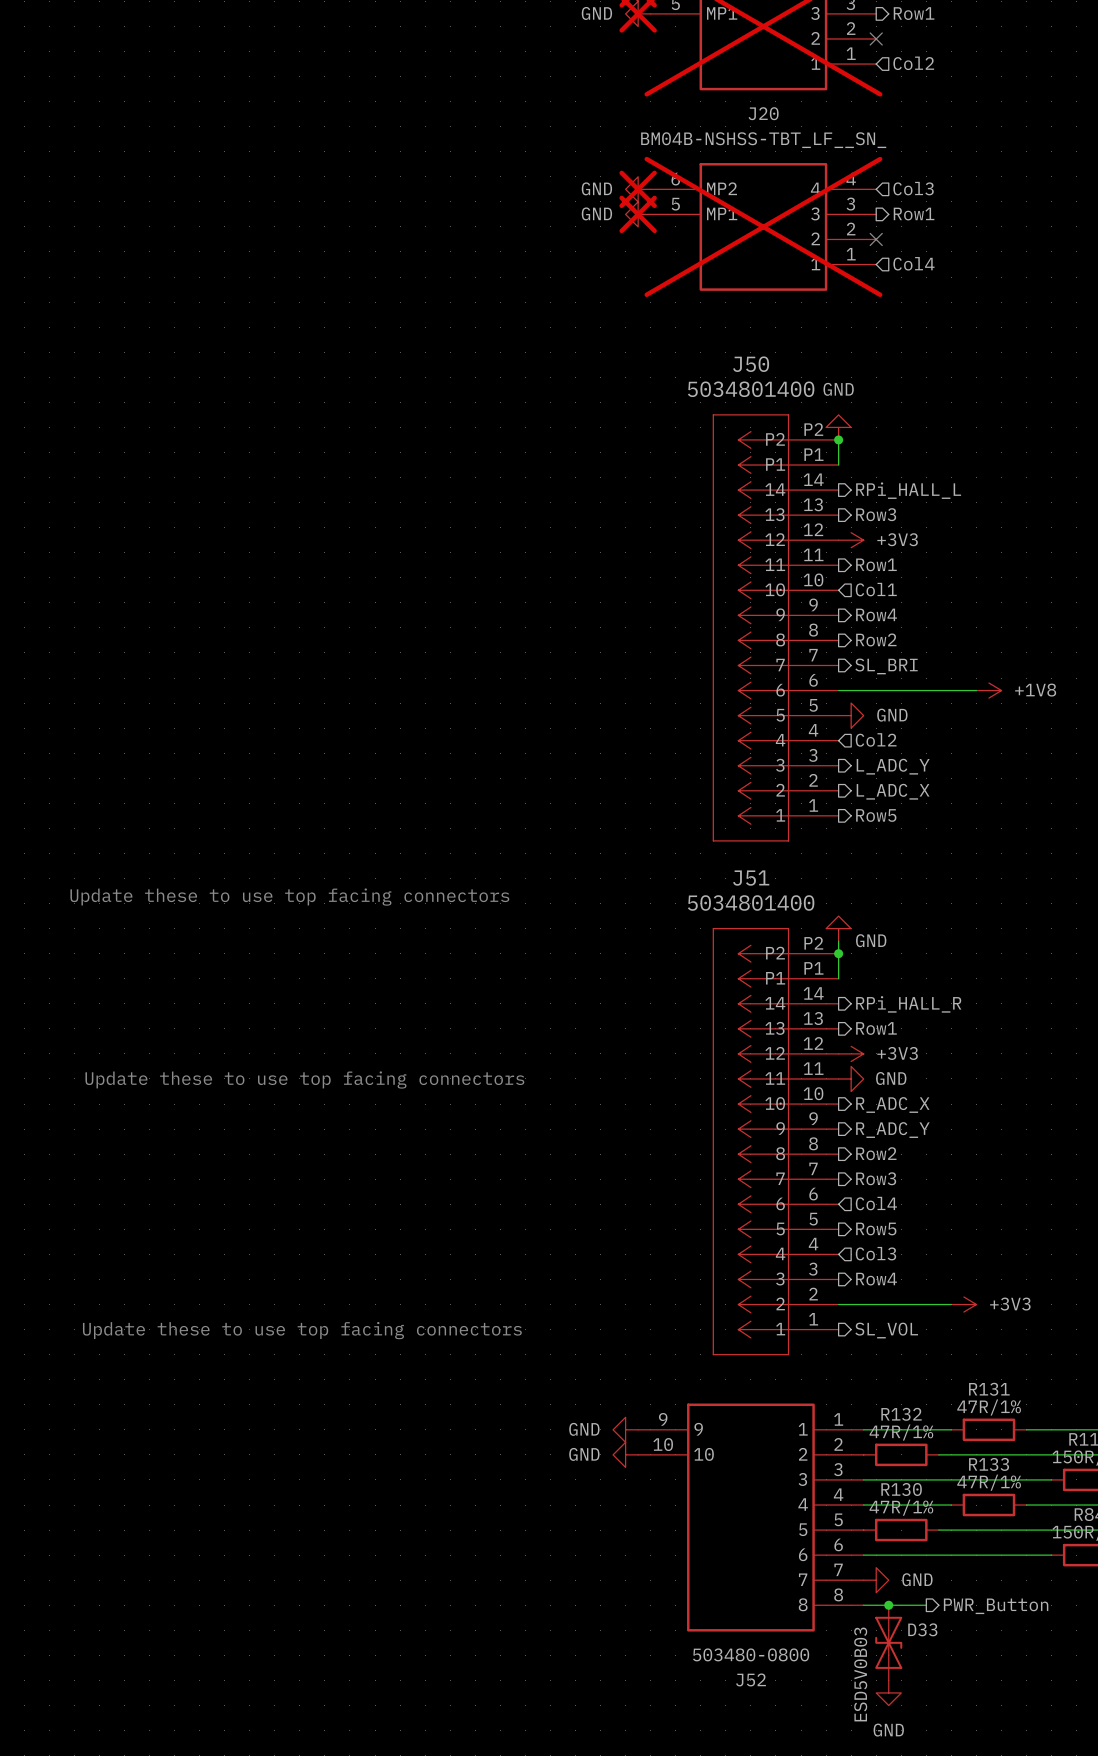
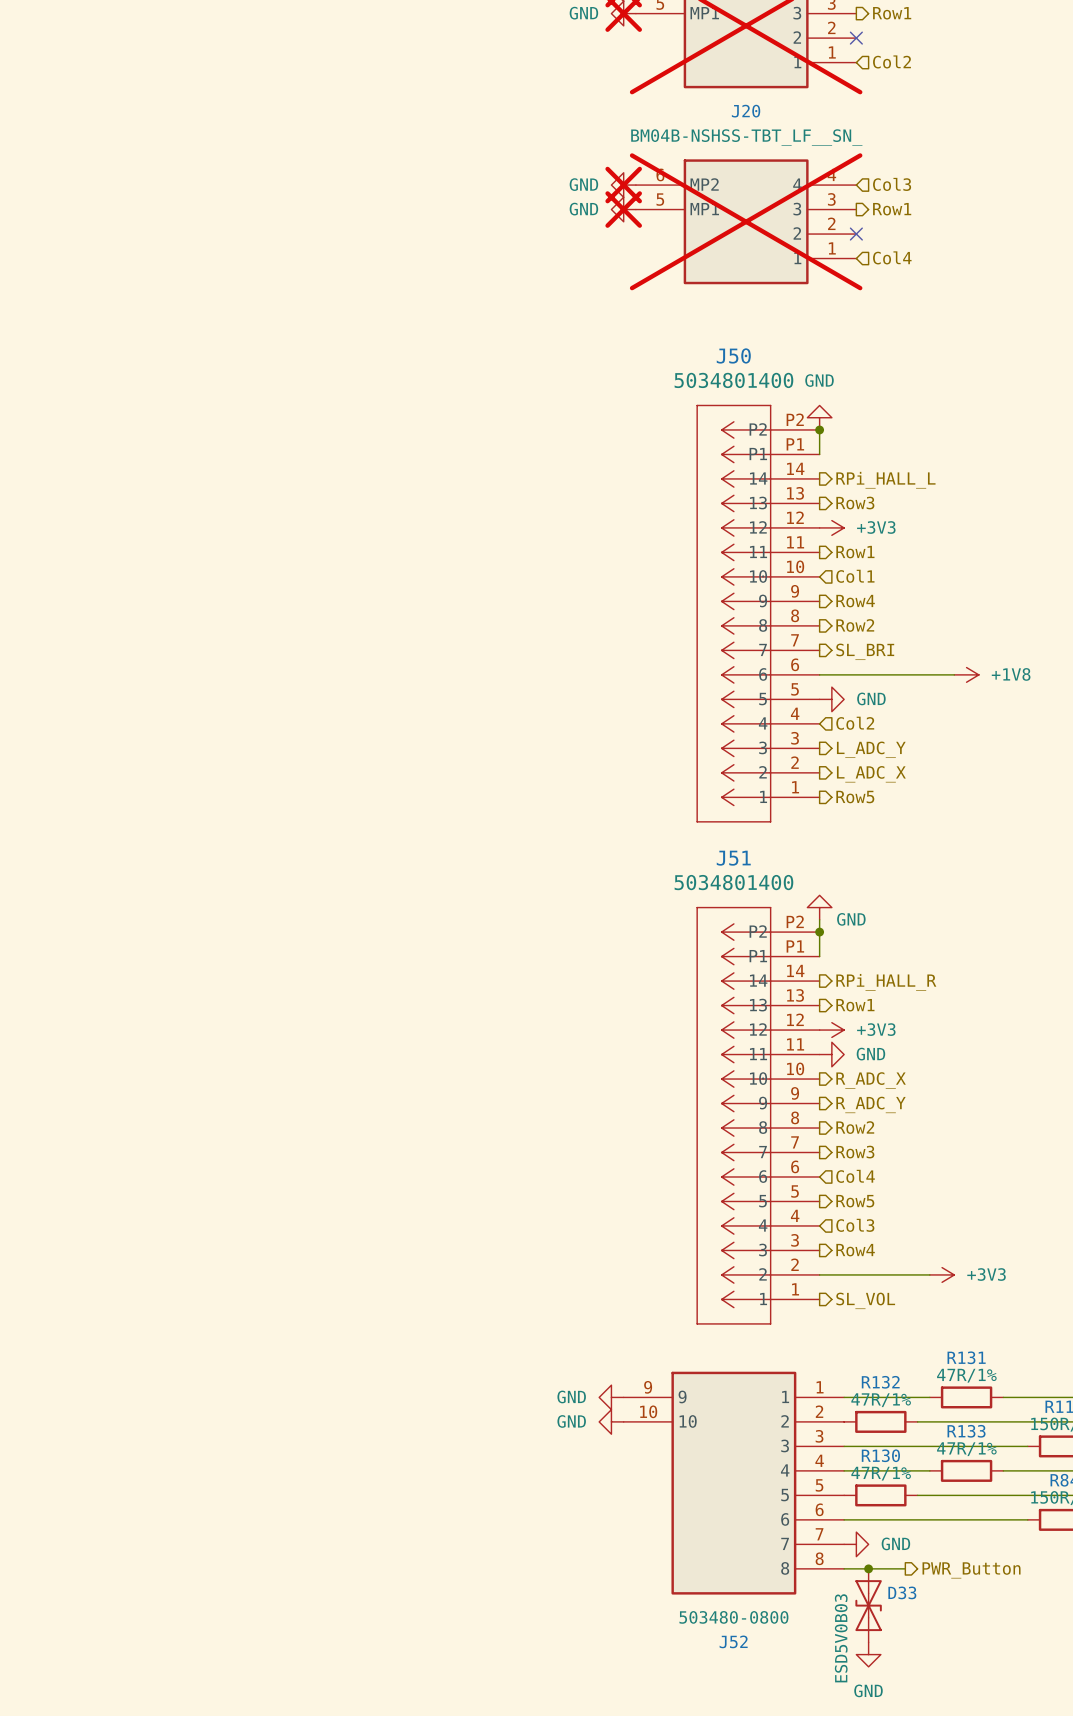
text: Update these to use top facing connectors (289, 897) -> none
text: Update these to use top facing connectors (304, 1080) -> none
text: Update these to use top facing connectors (302, 1330) -> none

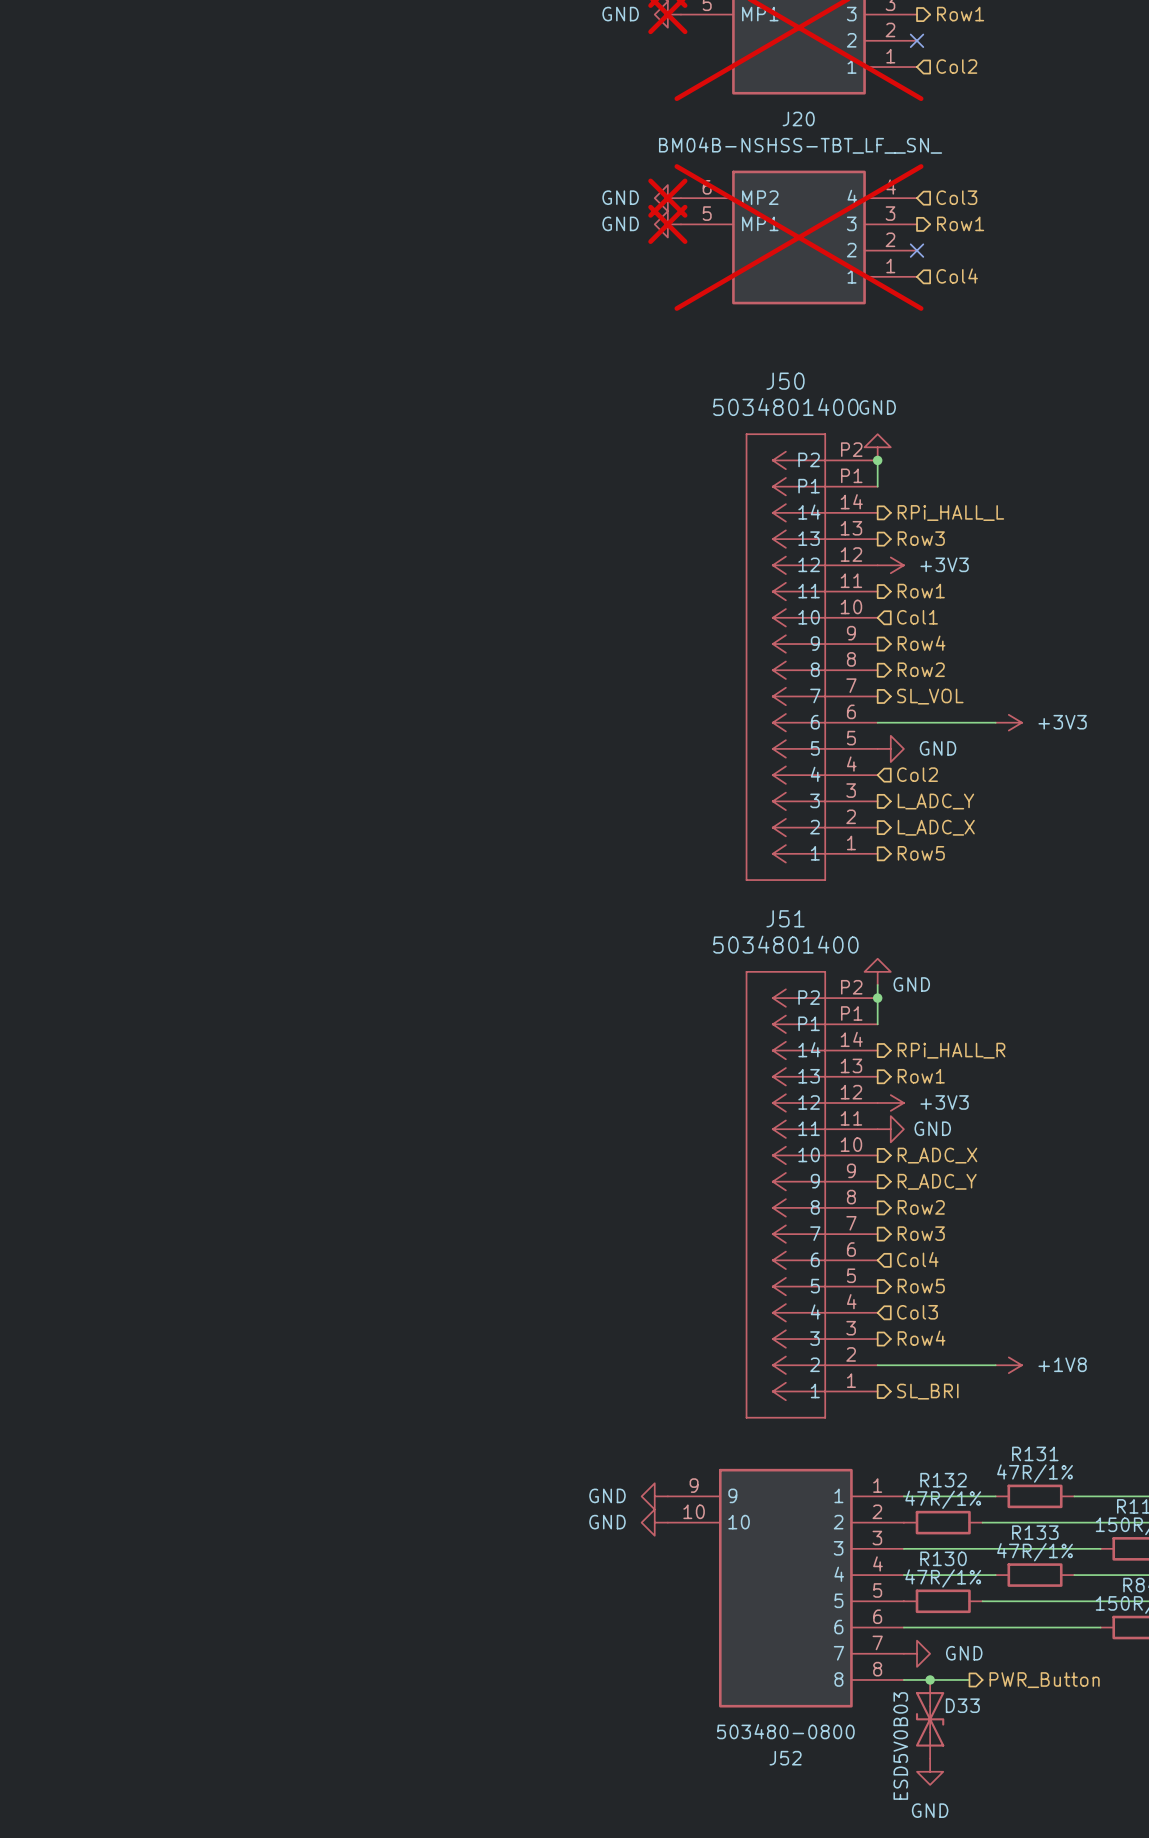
hierarchical label: SL_BRI (865, 651) -> SL_VOL (930, 696)
power symbol: none -> +3V3 (1008, 722)
power symbol: +1V8 (966, 674) -> none
power symbol: +3V3 (942, 1274) -> +1V8 (1008, 1365)
hierarchical label: SL_VOL (865, 1300) -> SL_BRI (927, 1391)

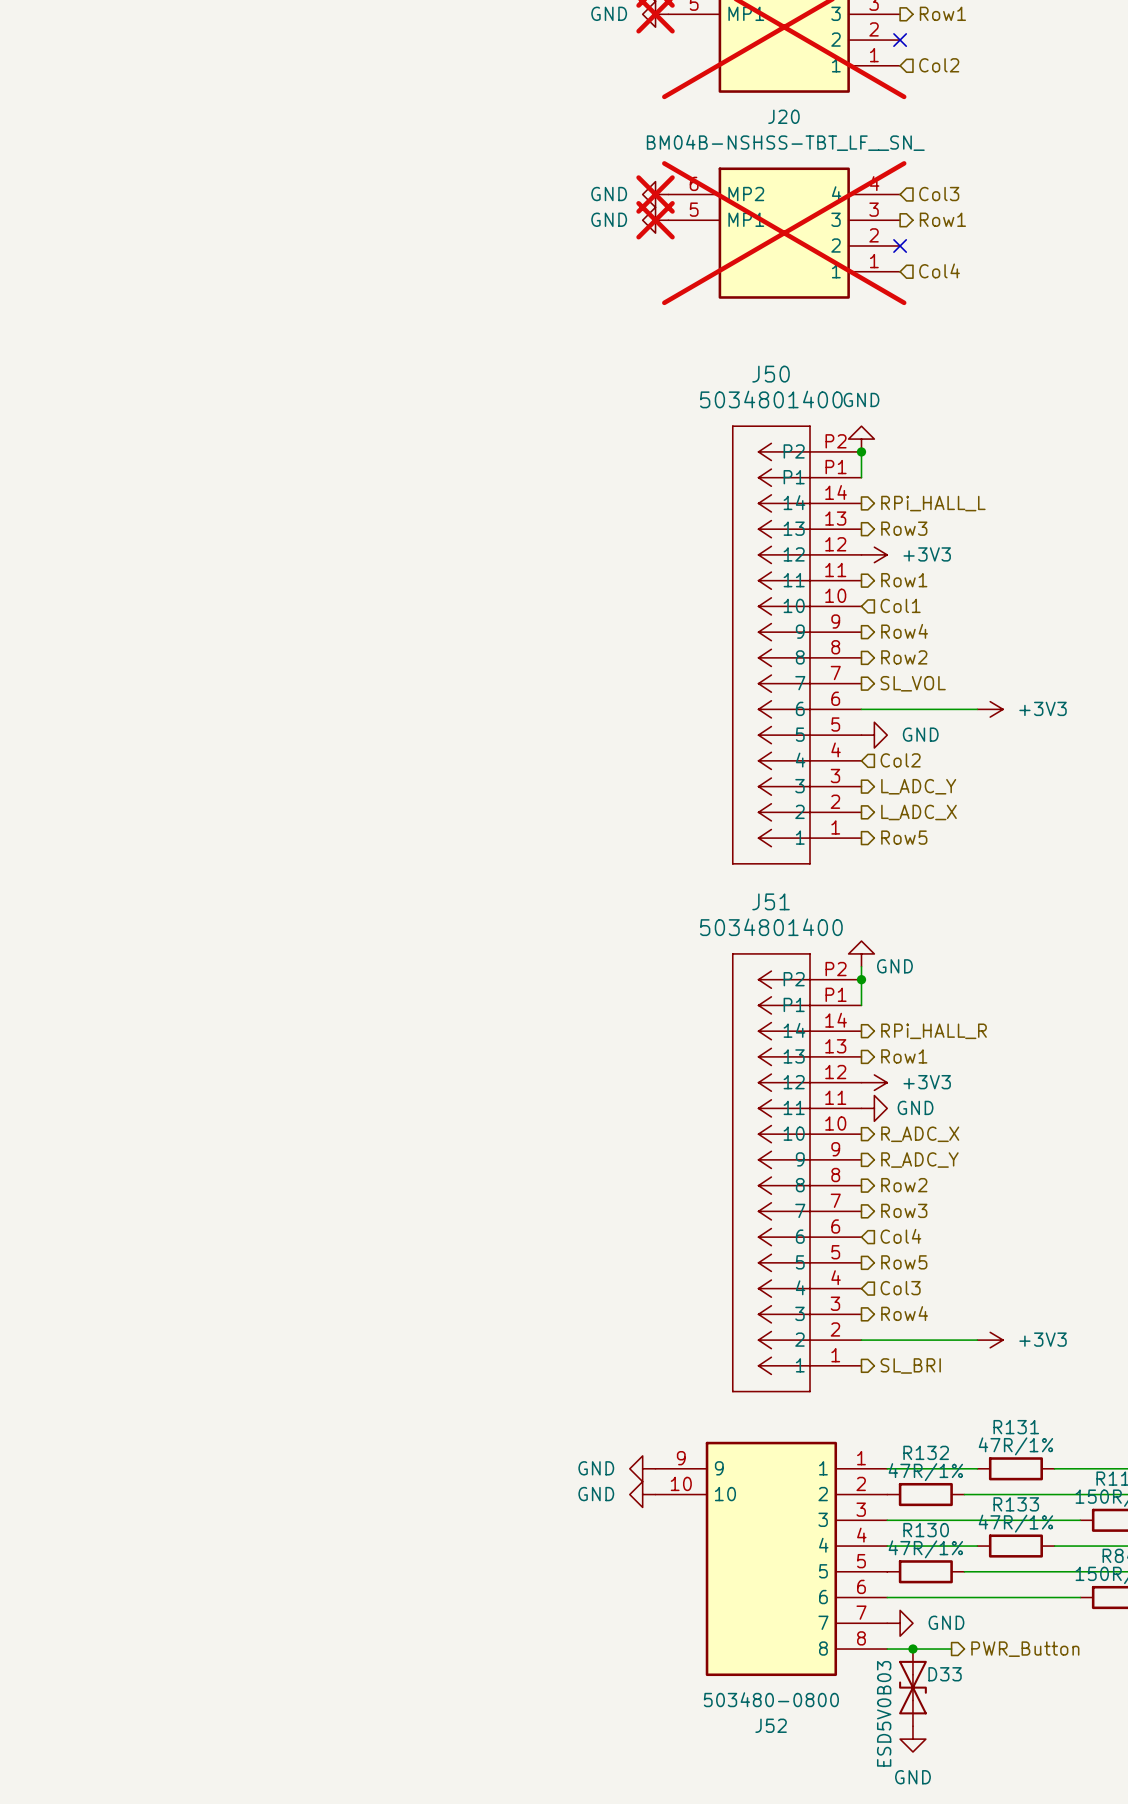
power symbol: +1V8 (1008, 1365) -> +3V3 (990, 1340)

